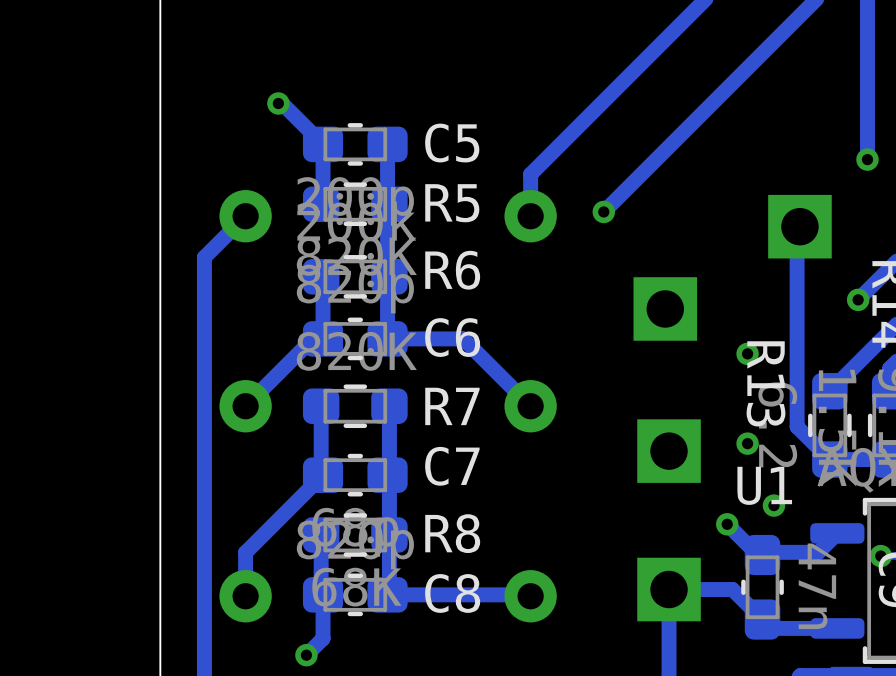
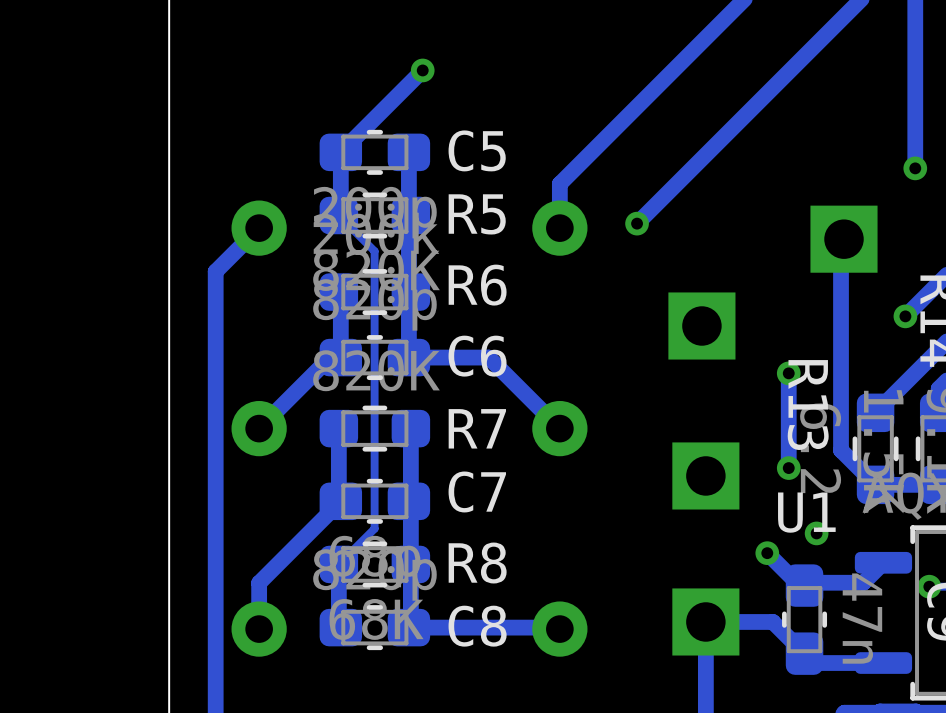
track: (278, 103) (282, 103) (323, 144) -> (422, 70) (340, 152)
via position: (278, 103) -> (422, 70)
track: none -> (338, 215) (374, 251) (374, 528) (338, 564)
track: none -> (788, 373) (788, 468)
track: (323, 594) (323, 638) (306, 655) -> none
via: (306, 655) -> none

